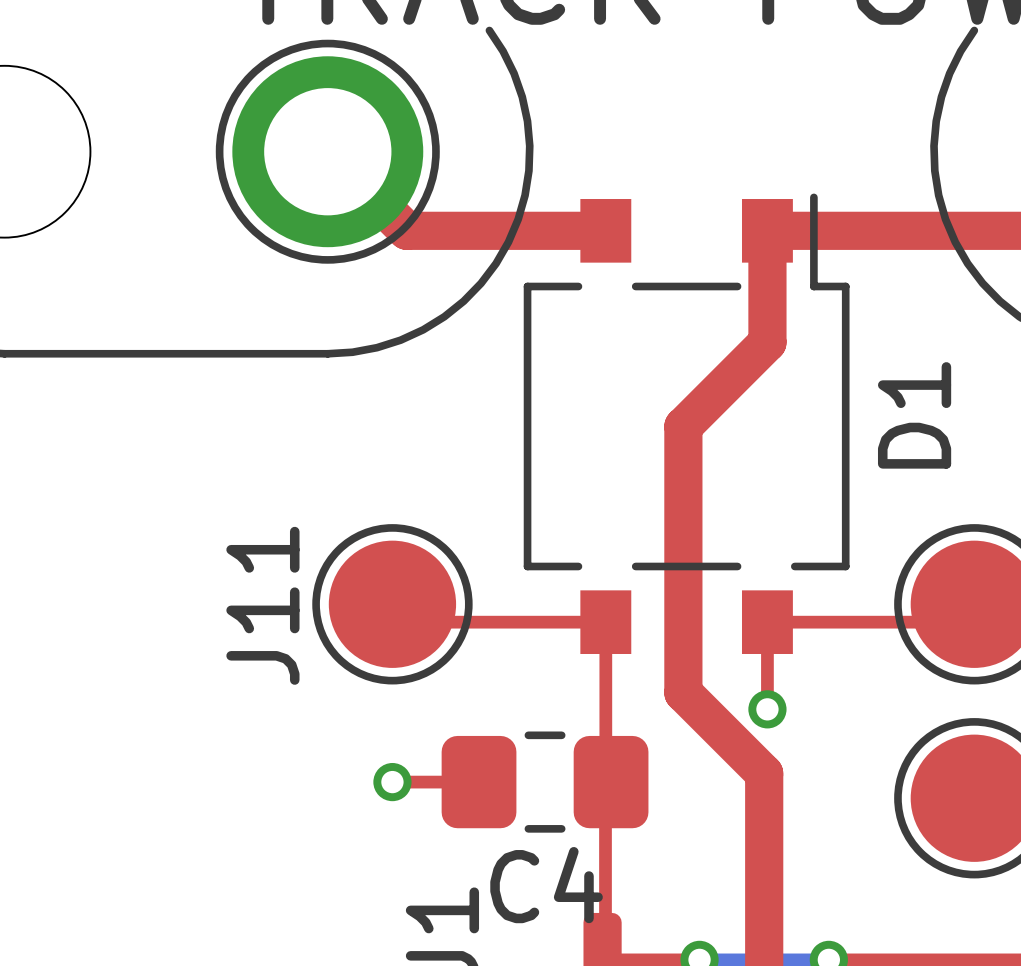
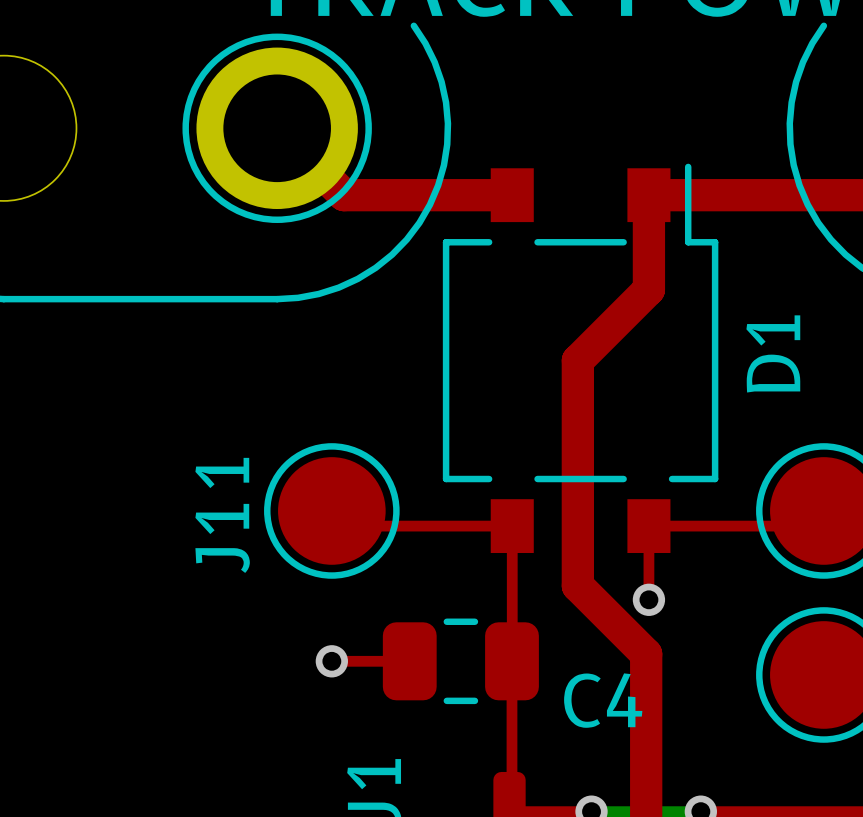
C4 footprint: [441, 731, 649, 833] -> [382, 618, 539, 705]
C4 name position: C4 (546, 885) -> C4 (603, 700)

